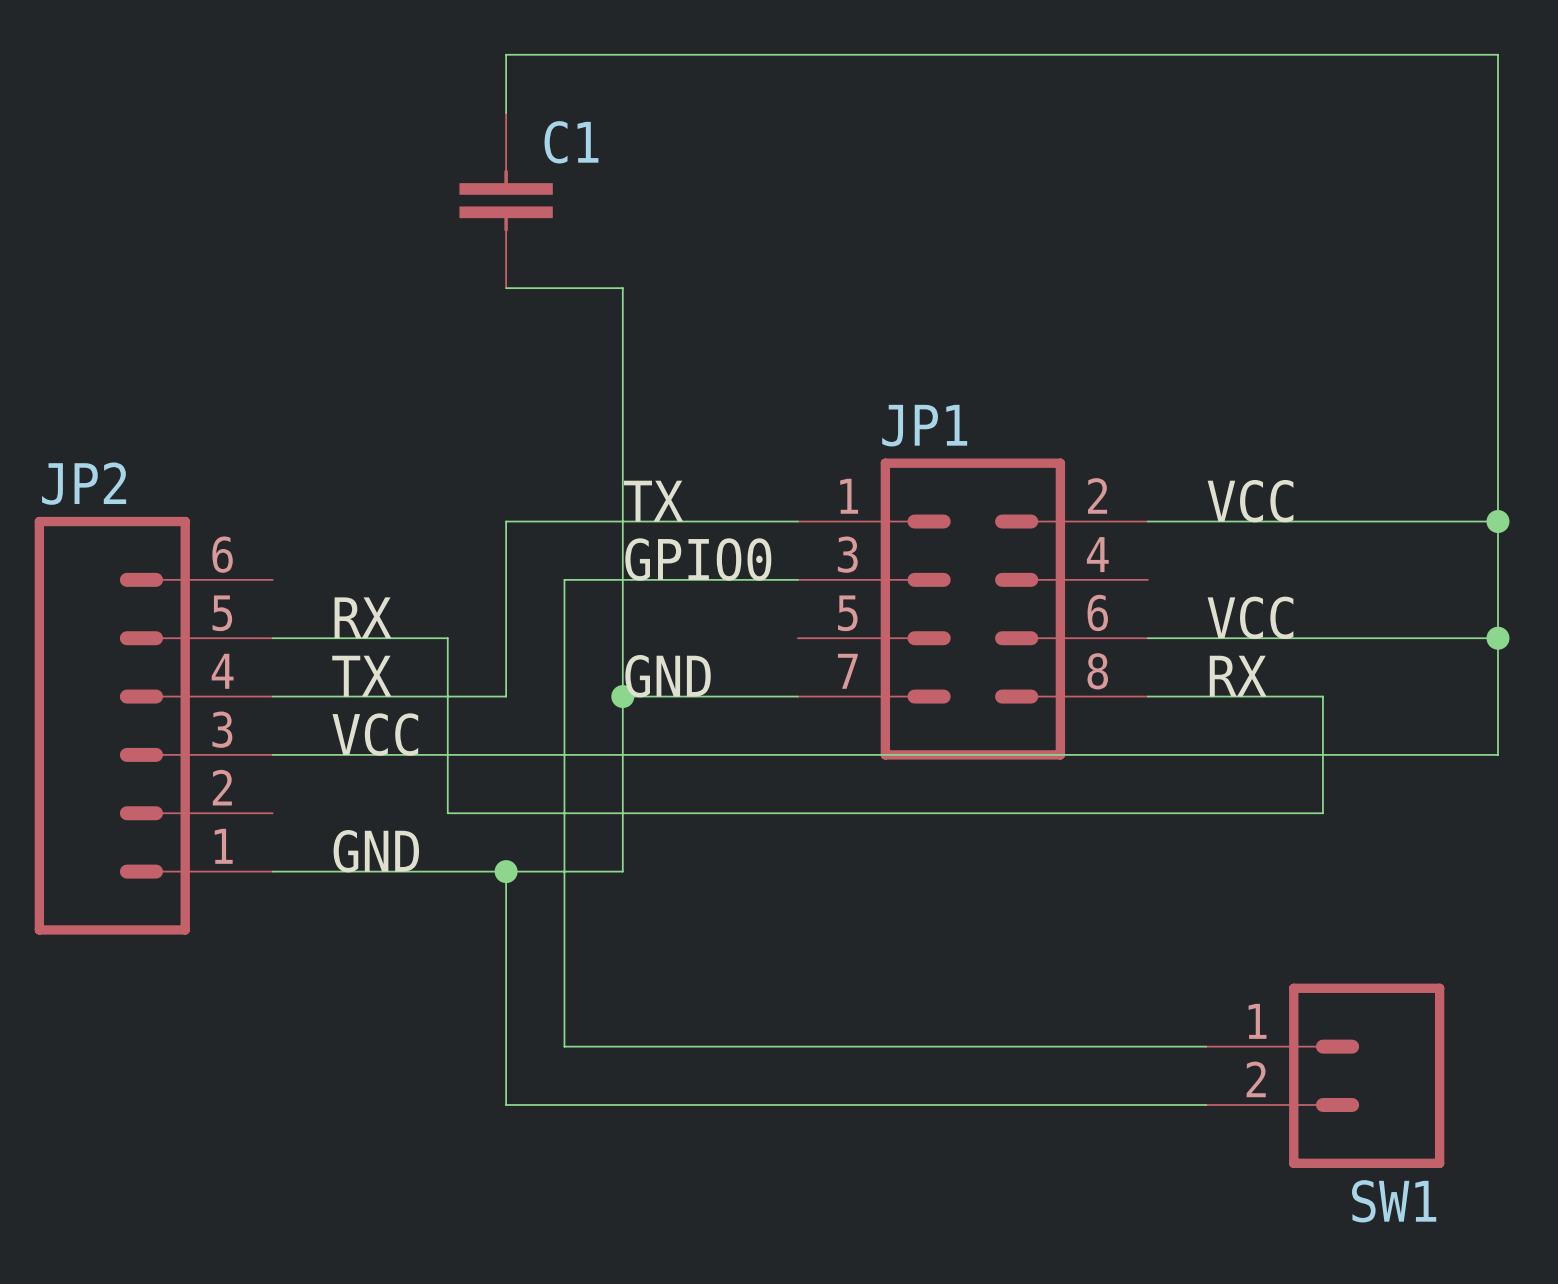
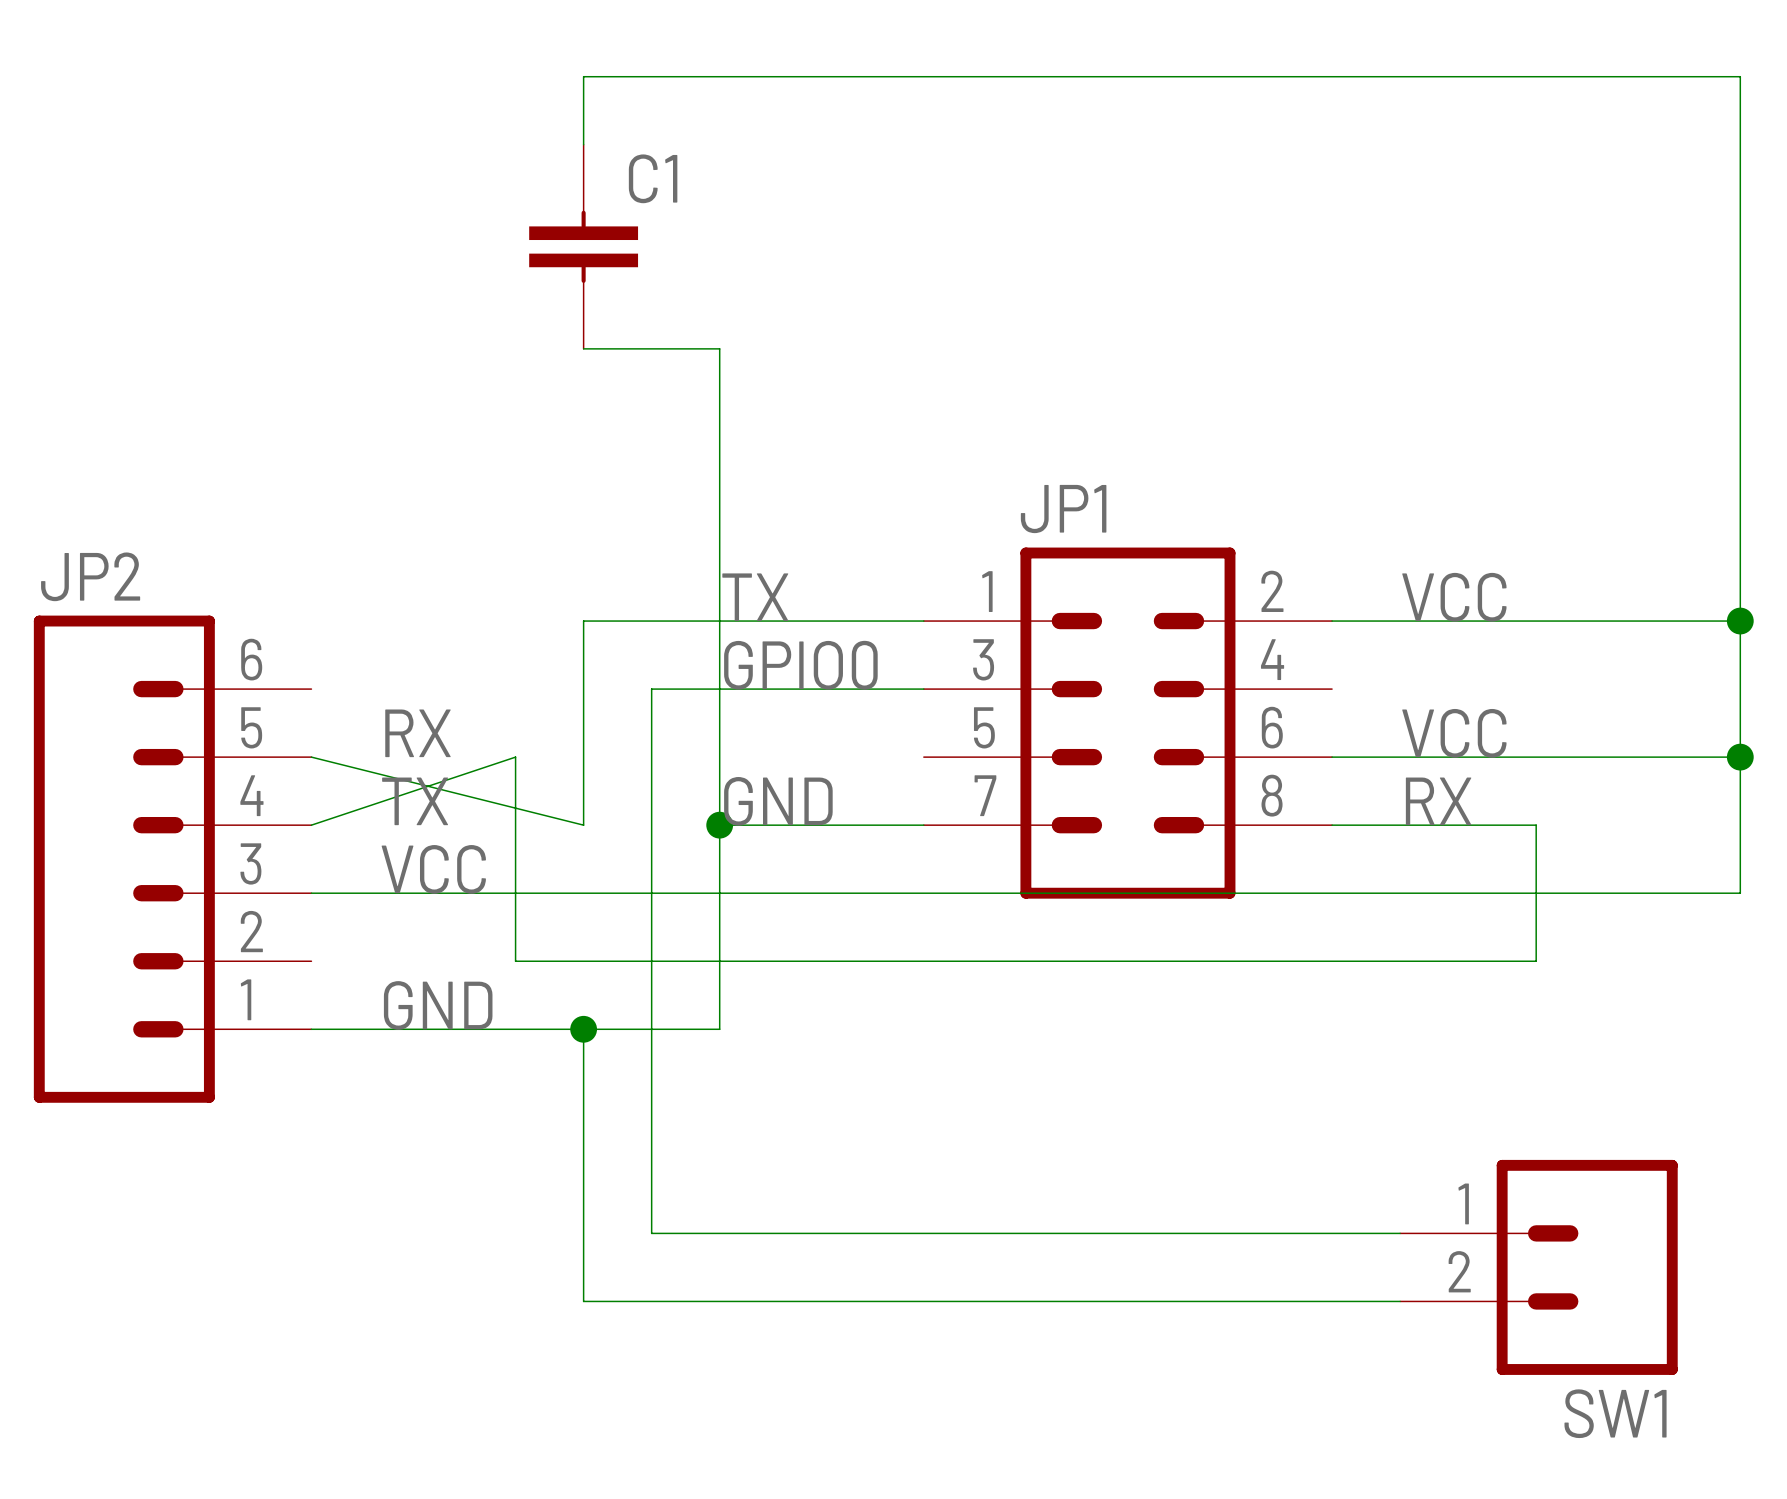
wire: (272, 638) (447, 638) -> (311, 825) (515, 757)
wire: (272, 696) (506, 696) -> (311, 757) (583, 825)

